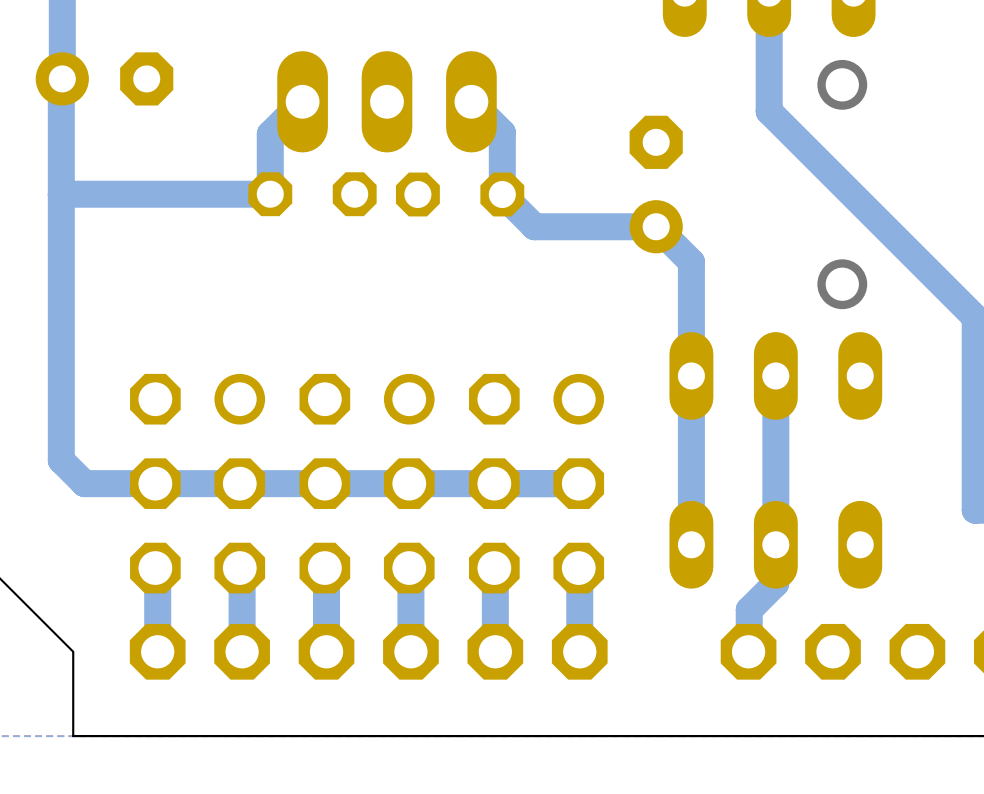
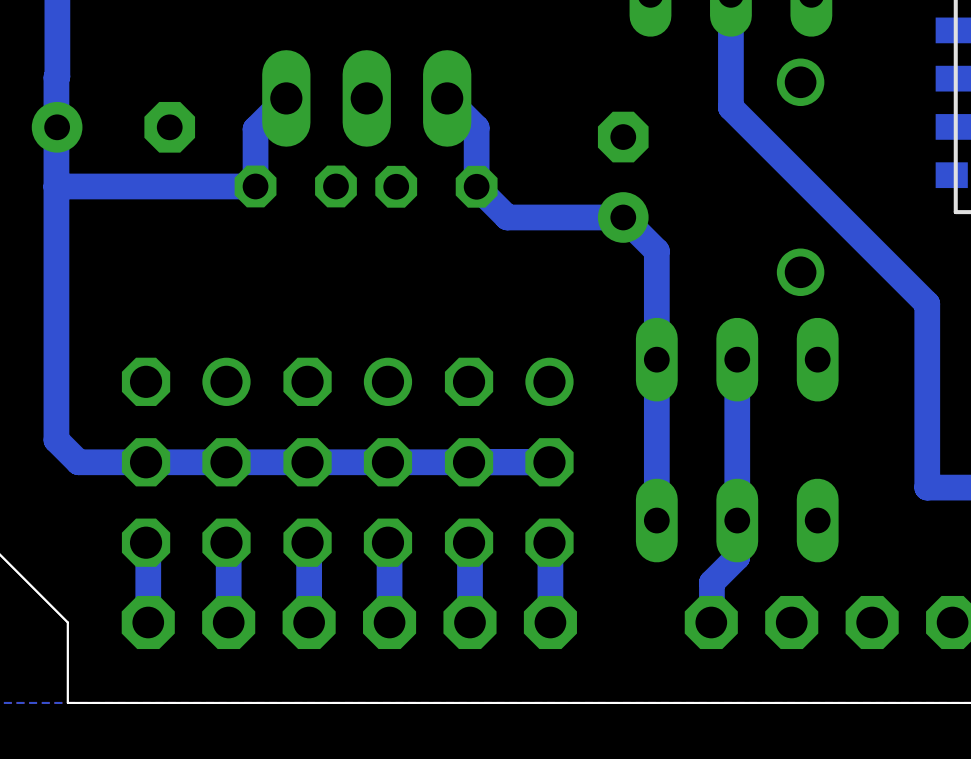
part: (104, 78) -> none
part: none -> (113, 127)

